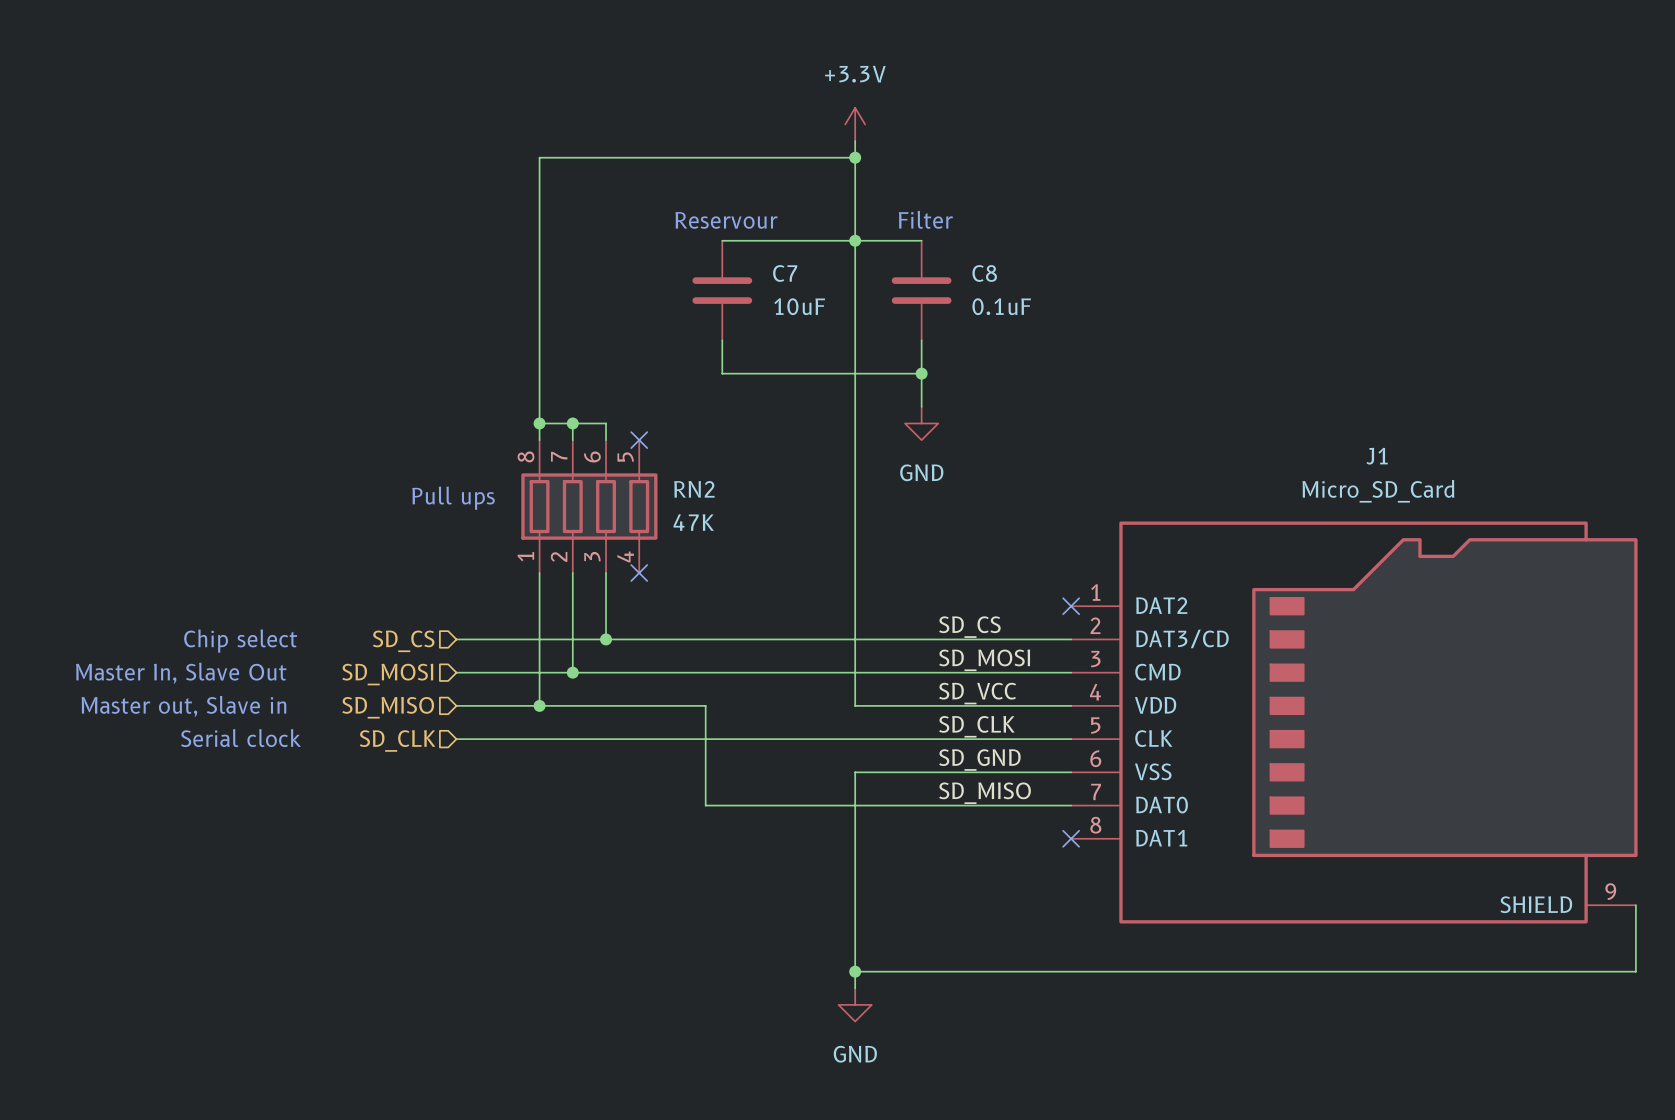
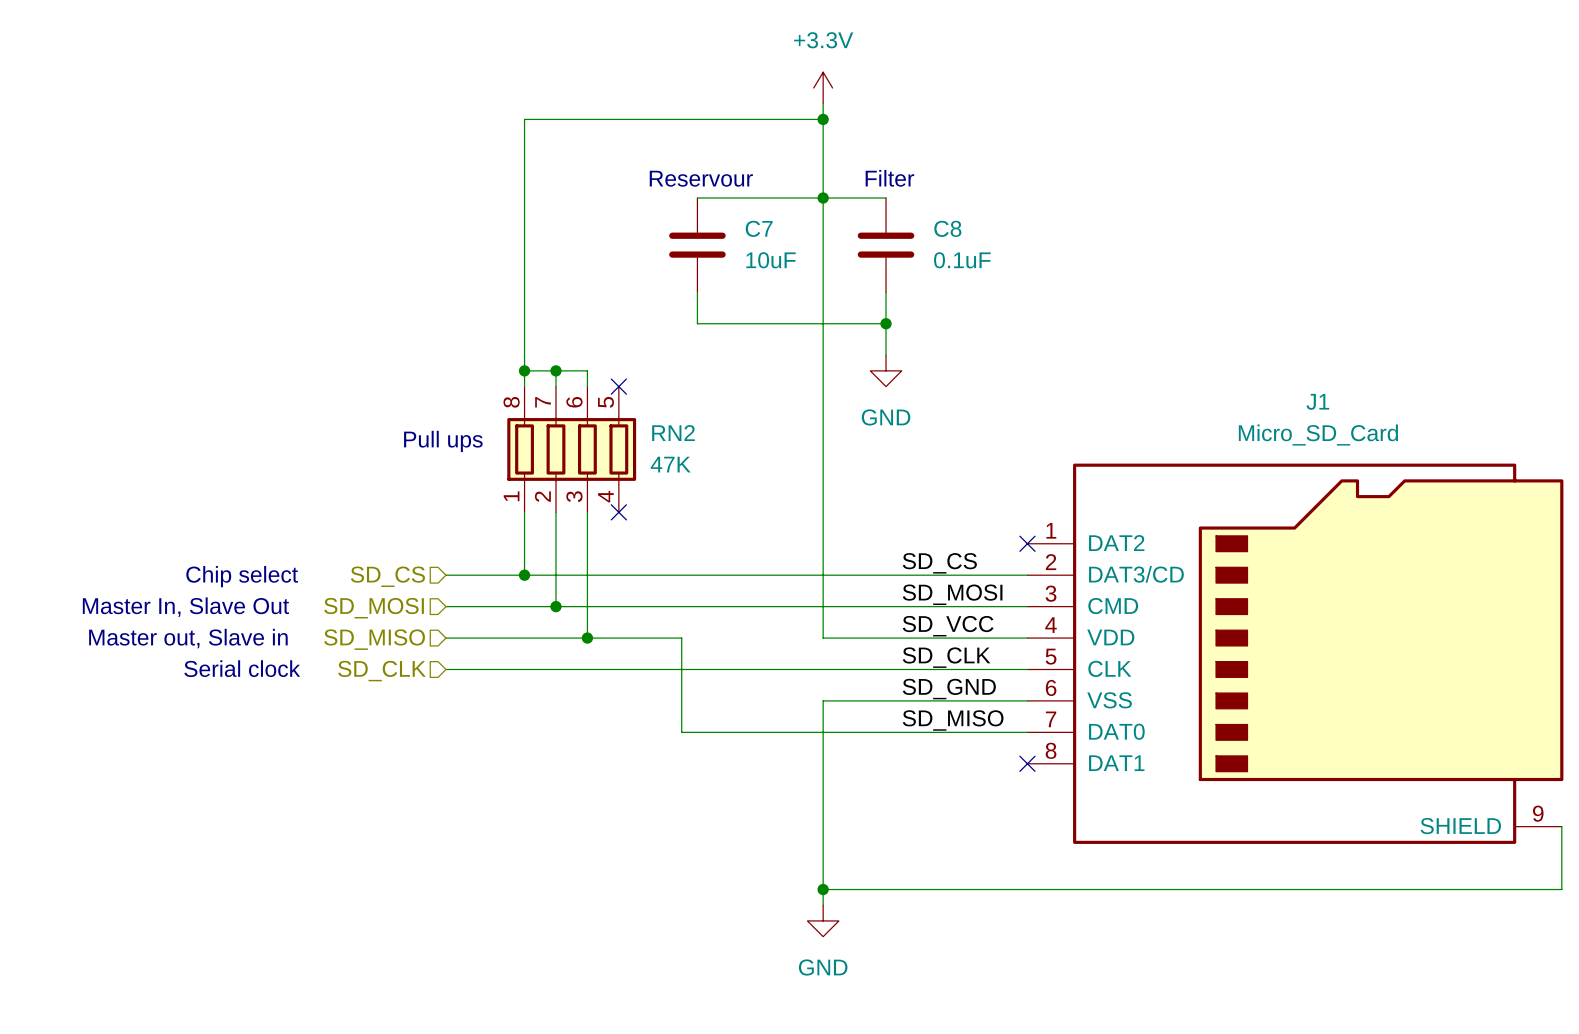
wire: (539, 639) (539, 705) -> (587, 575) (587, 638)
junction: none -> (524, 575)
junction: (606, 639) -> none
junction: (539, 705) -> none
junction: none -> (587, 638)

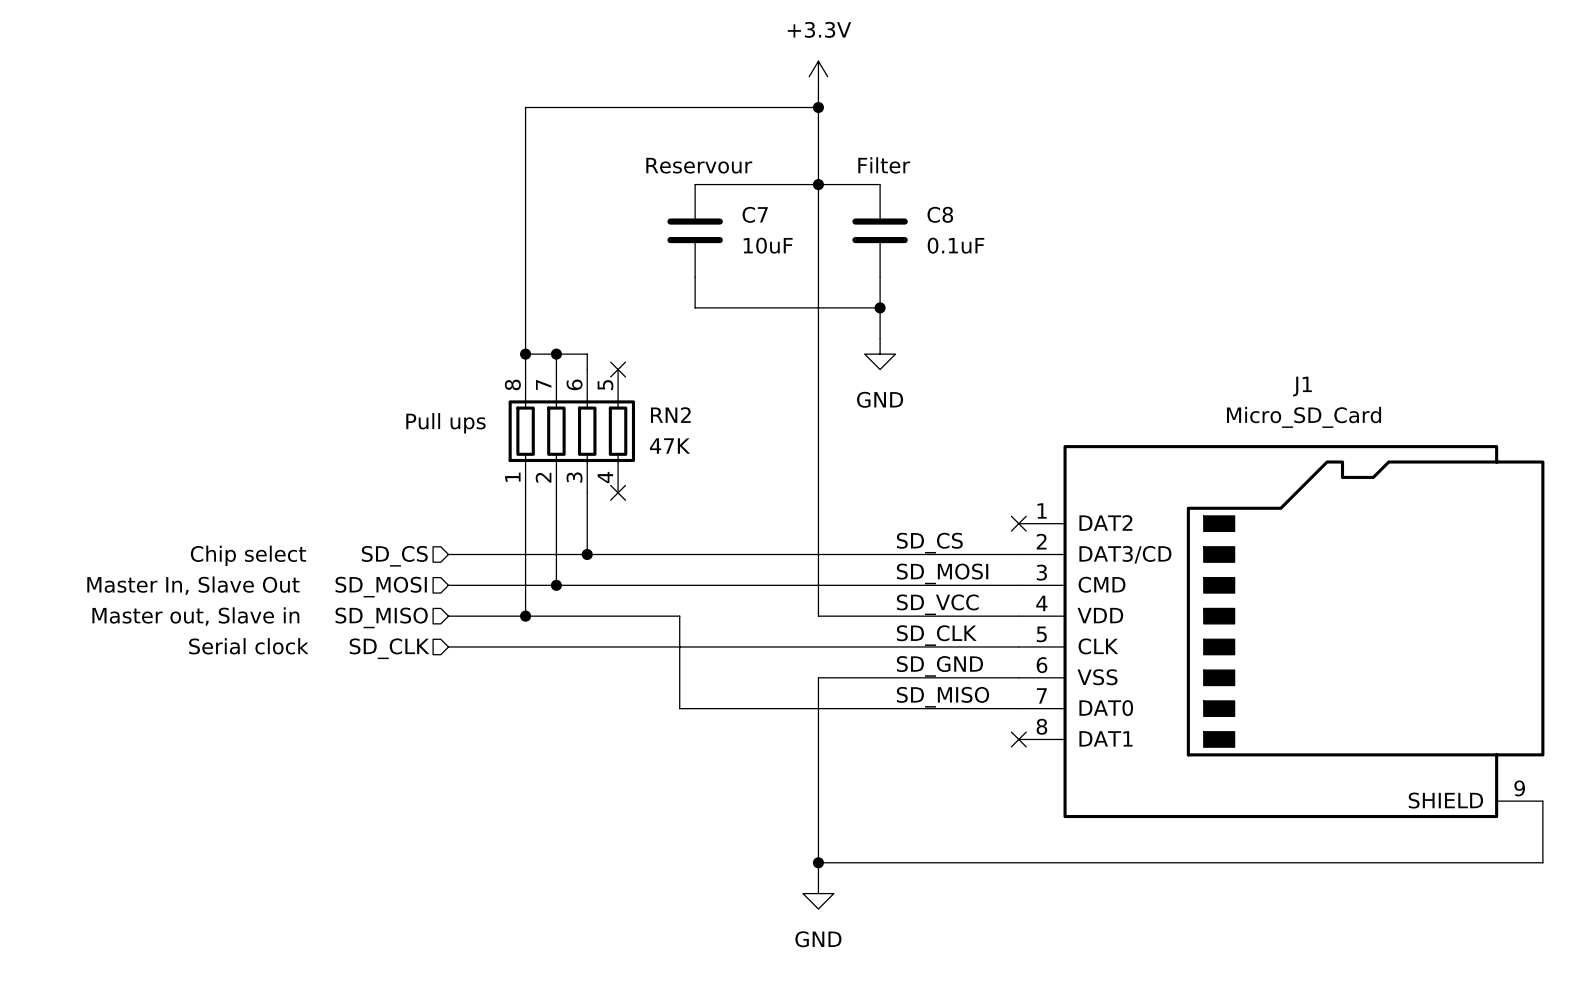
junction: (524, 575) -> none
wire: (587, 575) (587, 638) -> (525, 554) (525, 616)
junction: none -> (587, 554)
junction: none -> (525, 616)
junction: (587, 638) -> none

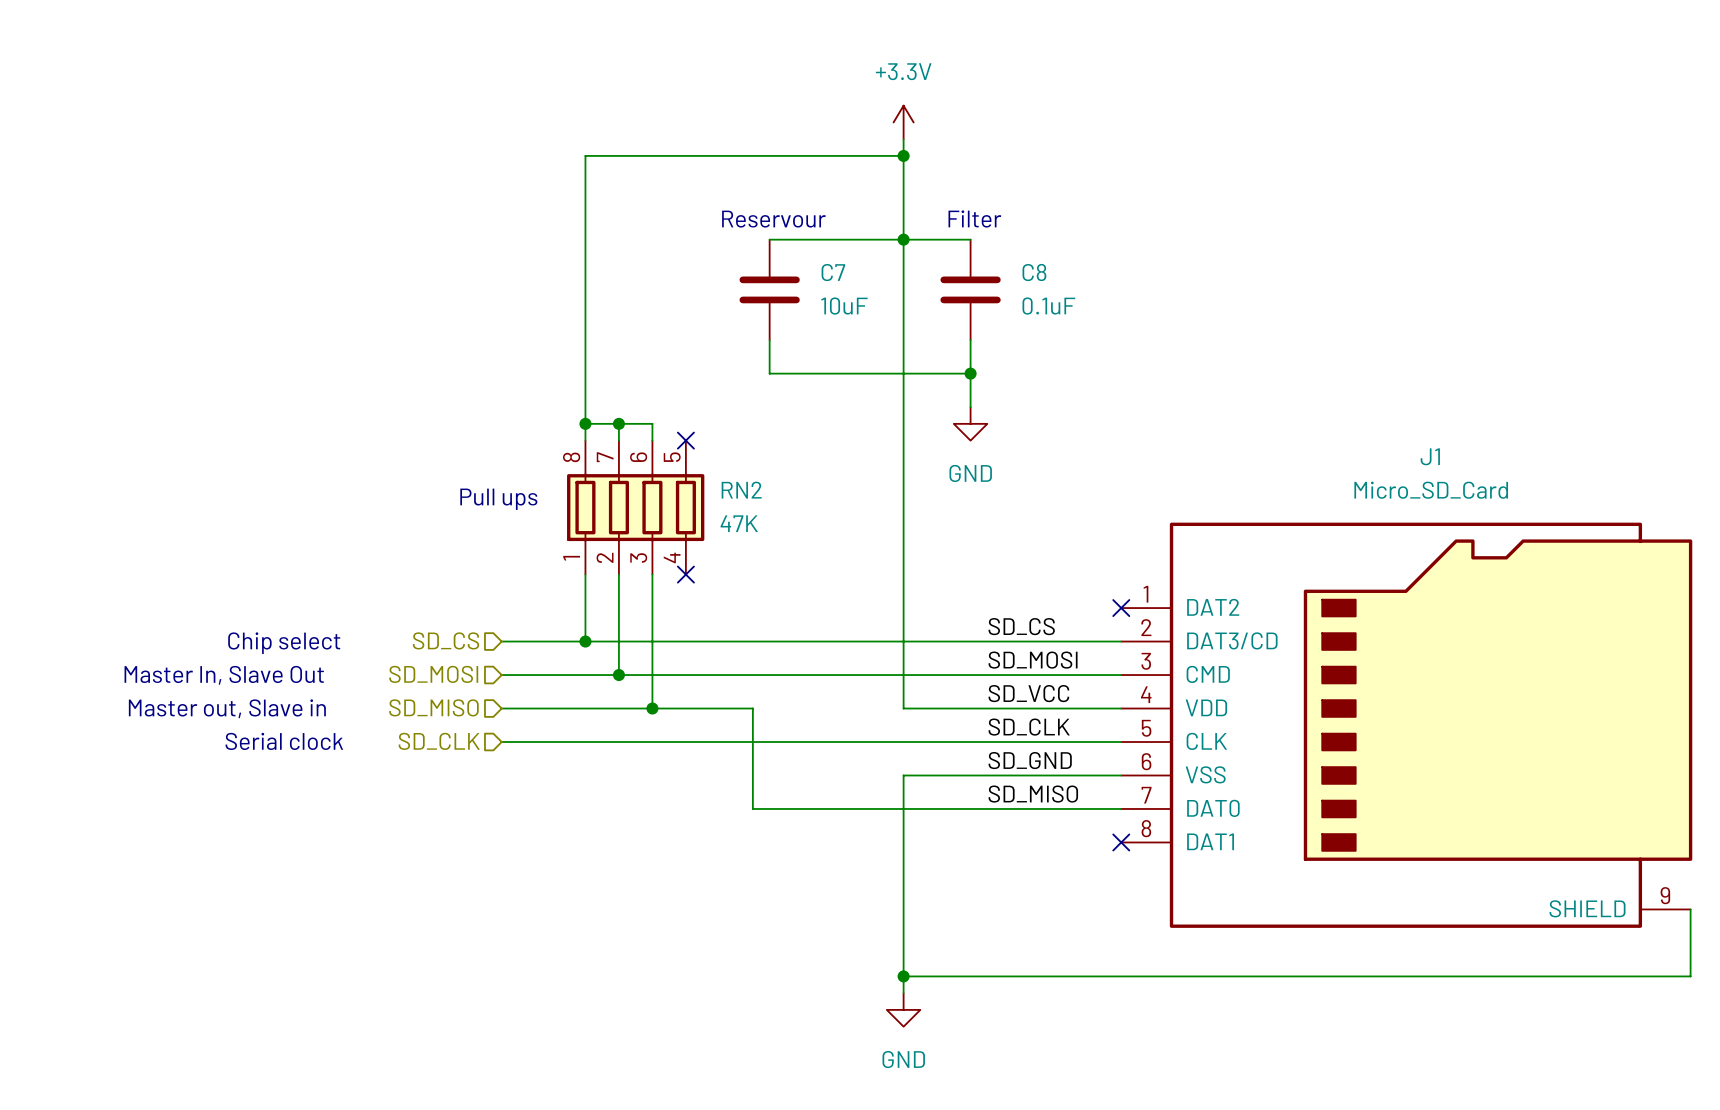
wire: (525, 554) (525, 616) -> (652, 641) (652, 708)
junction: none -> (585, 641)
junction: (587, 554) -> none
junction: (525, 616) -> none
junction: none -> (652, 708)

